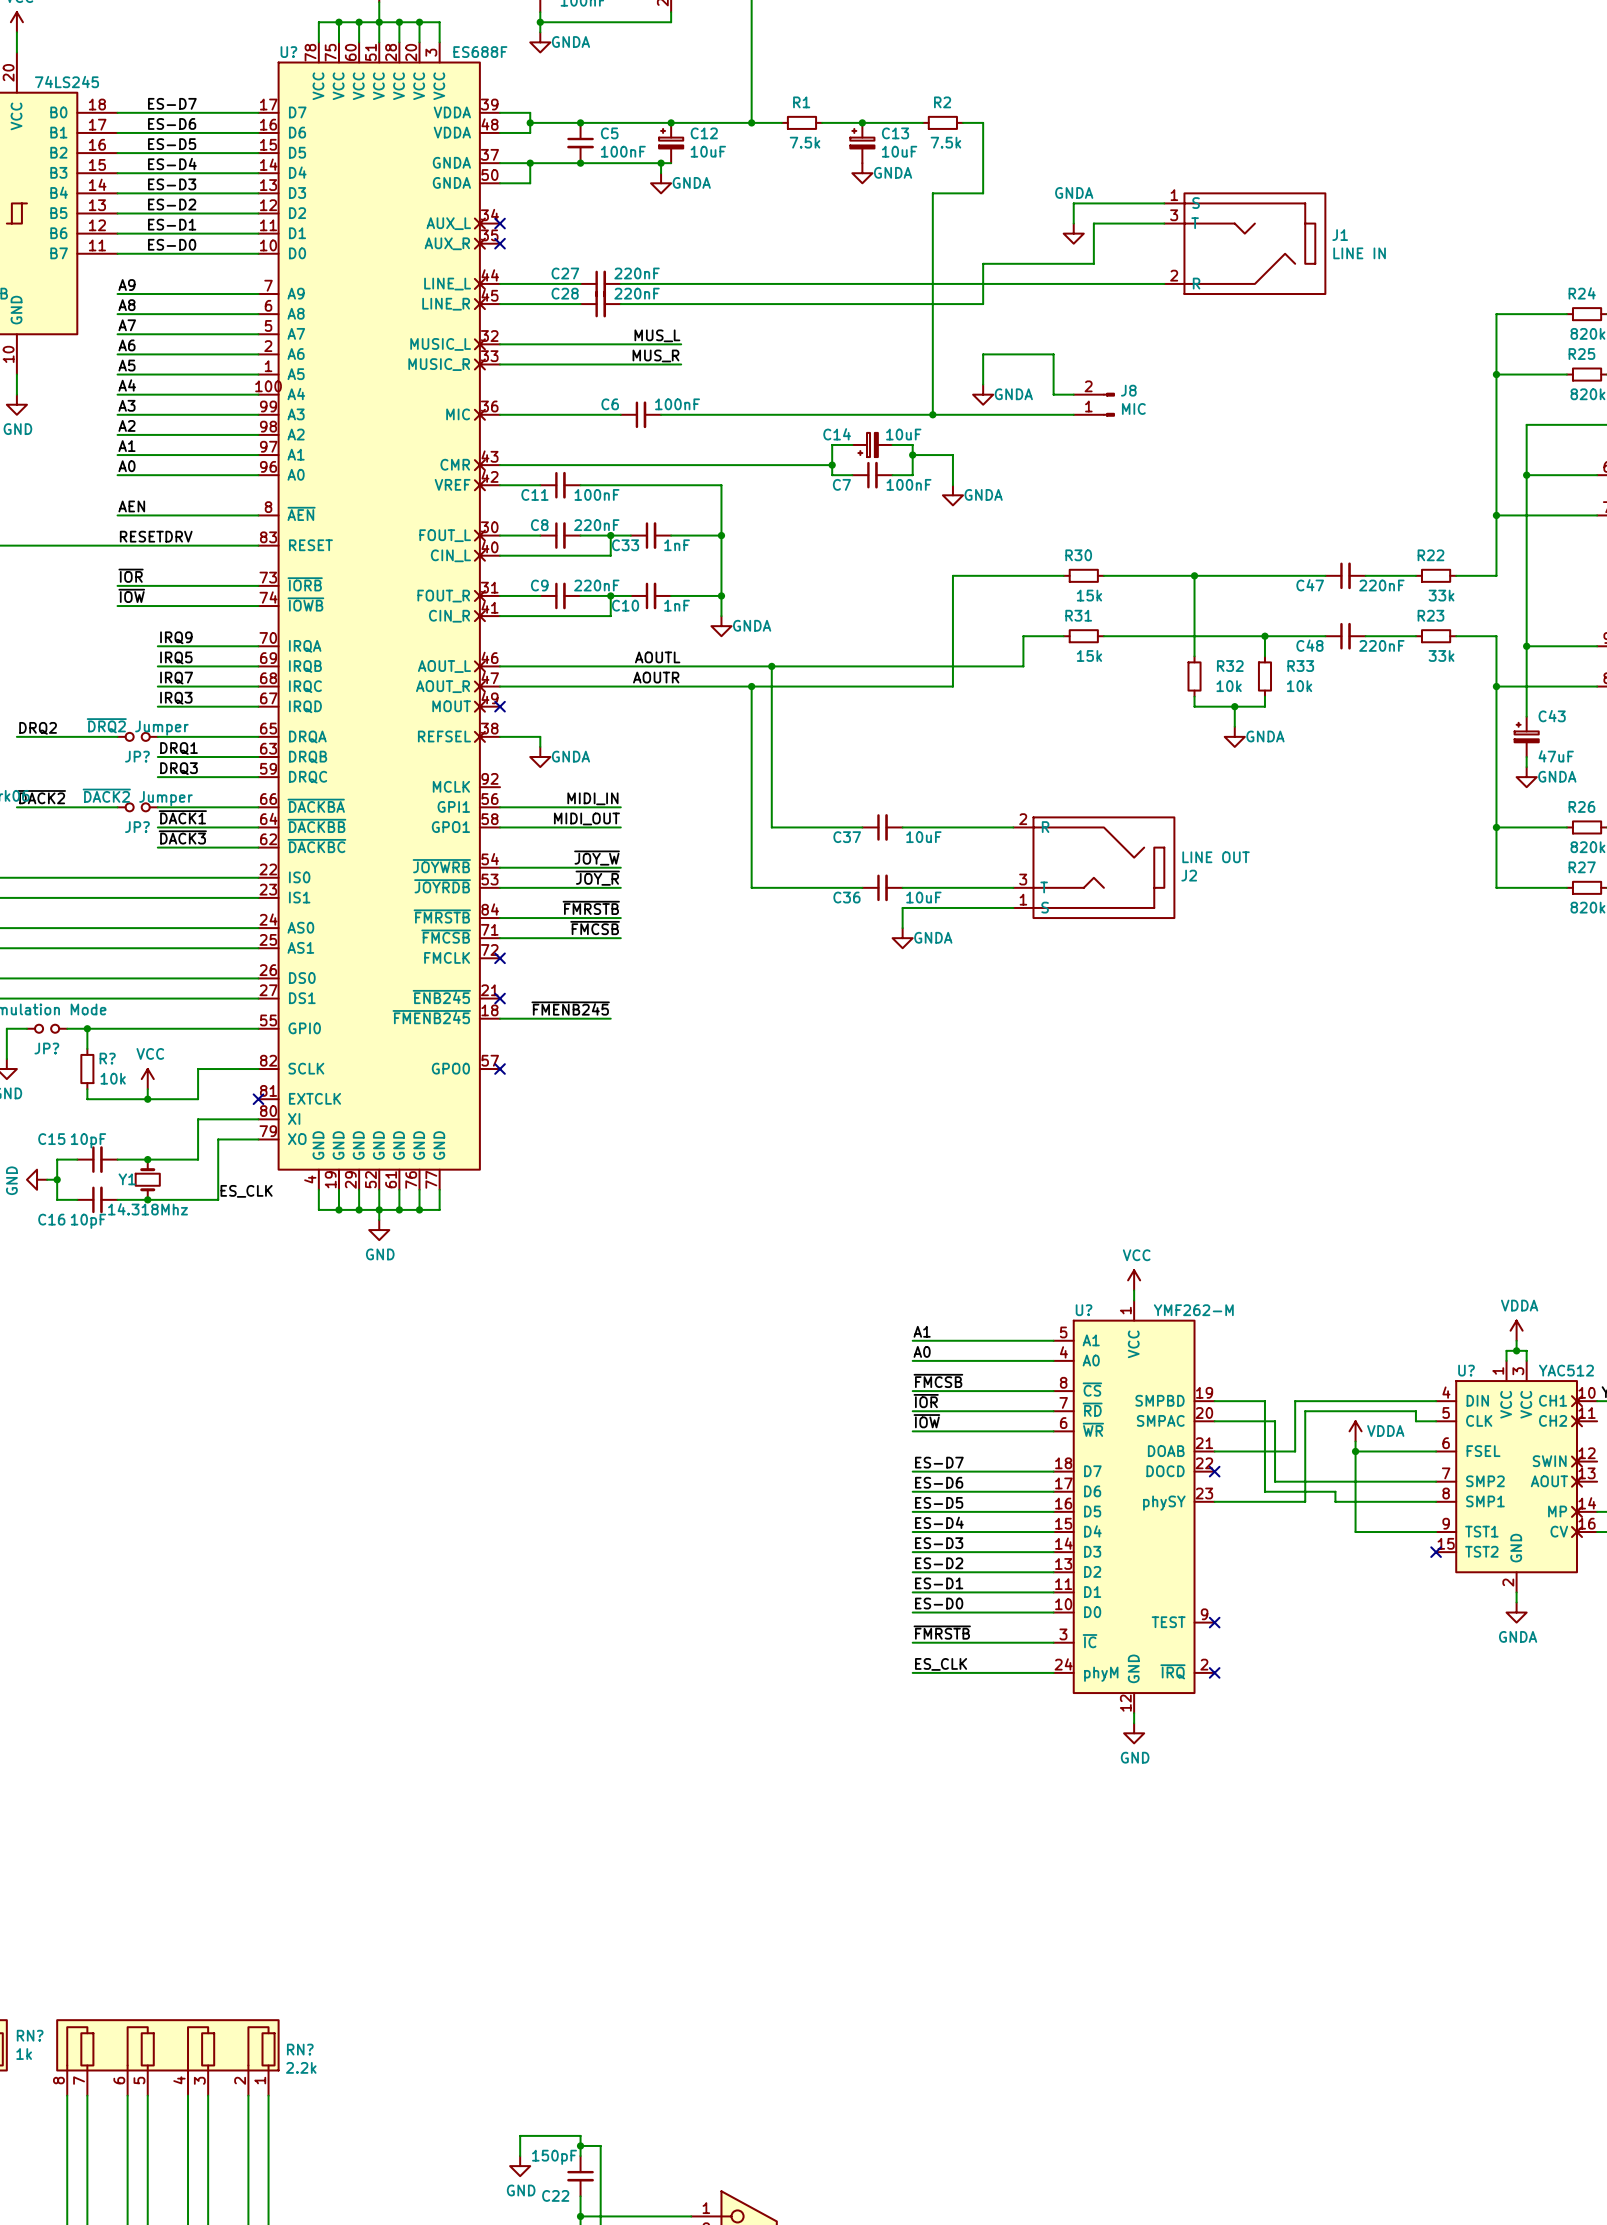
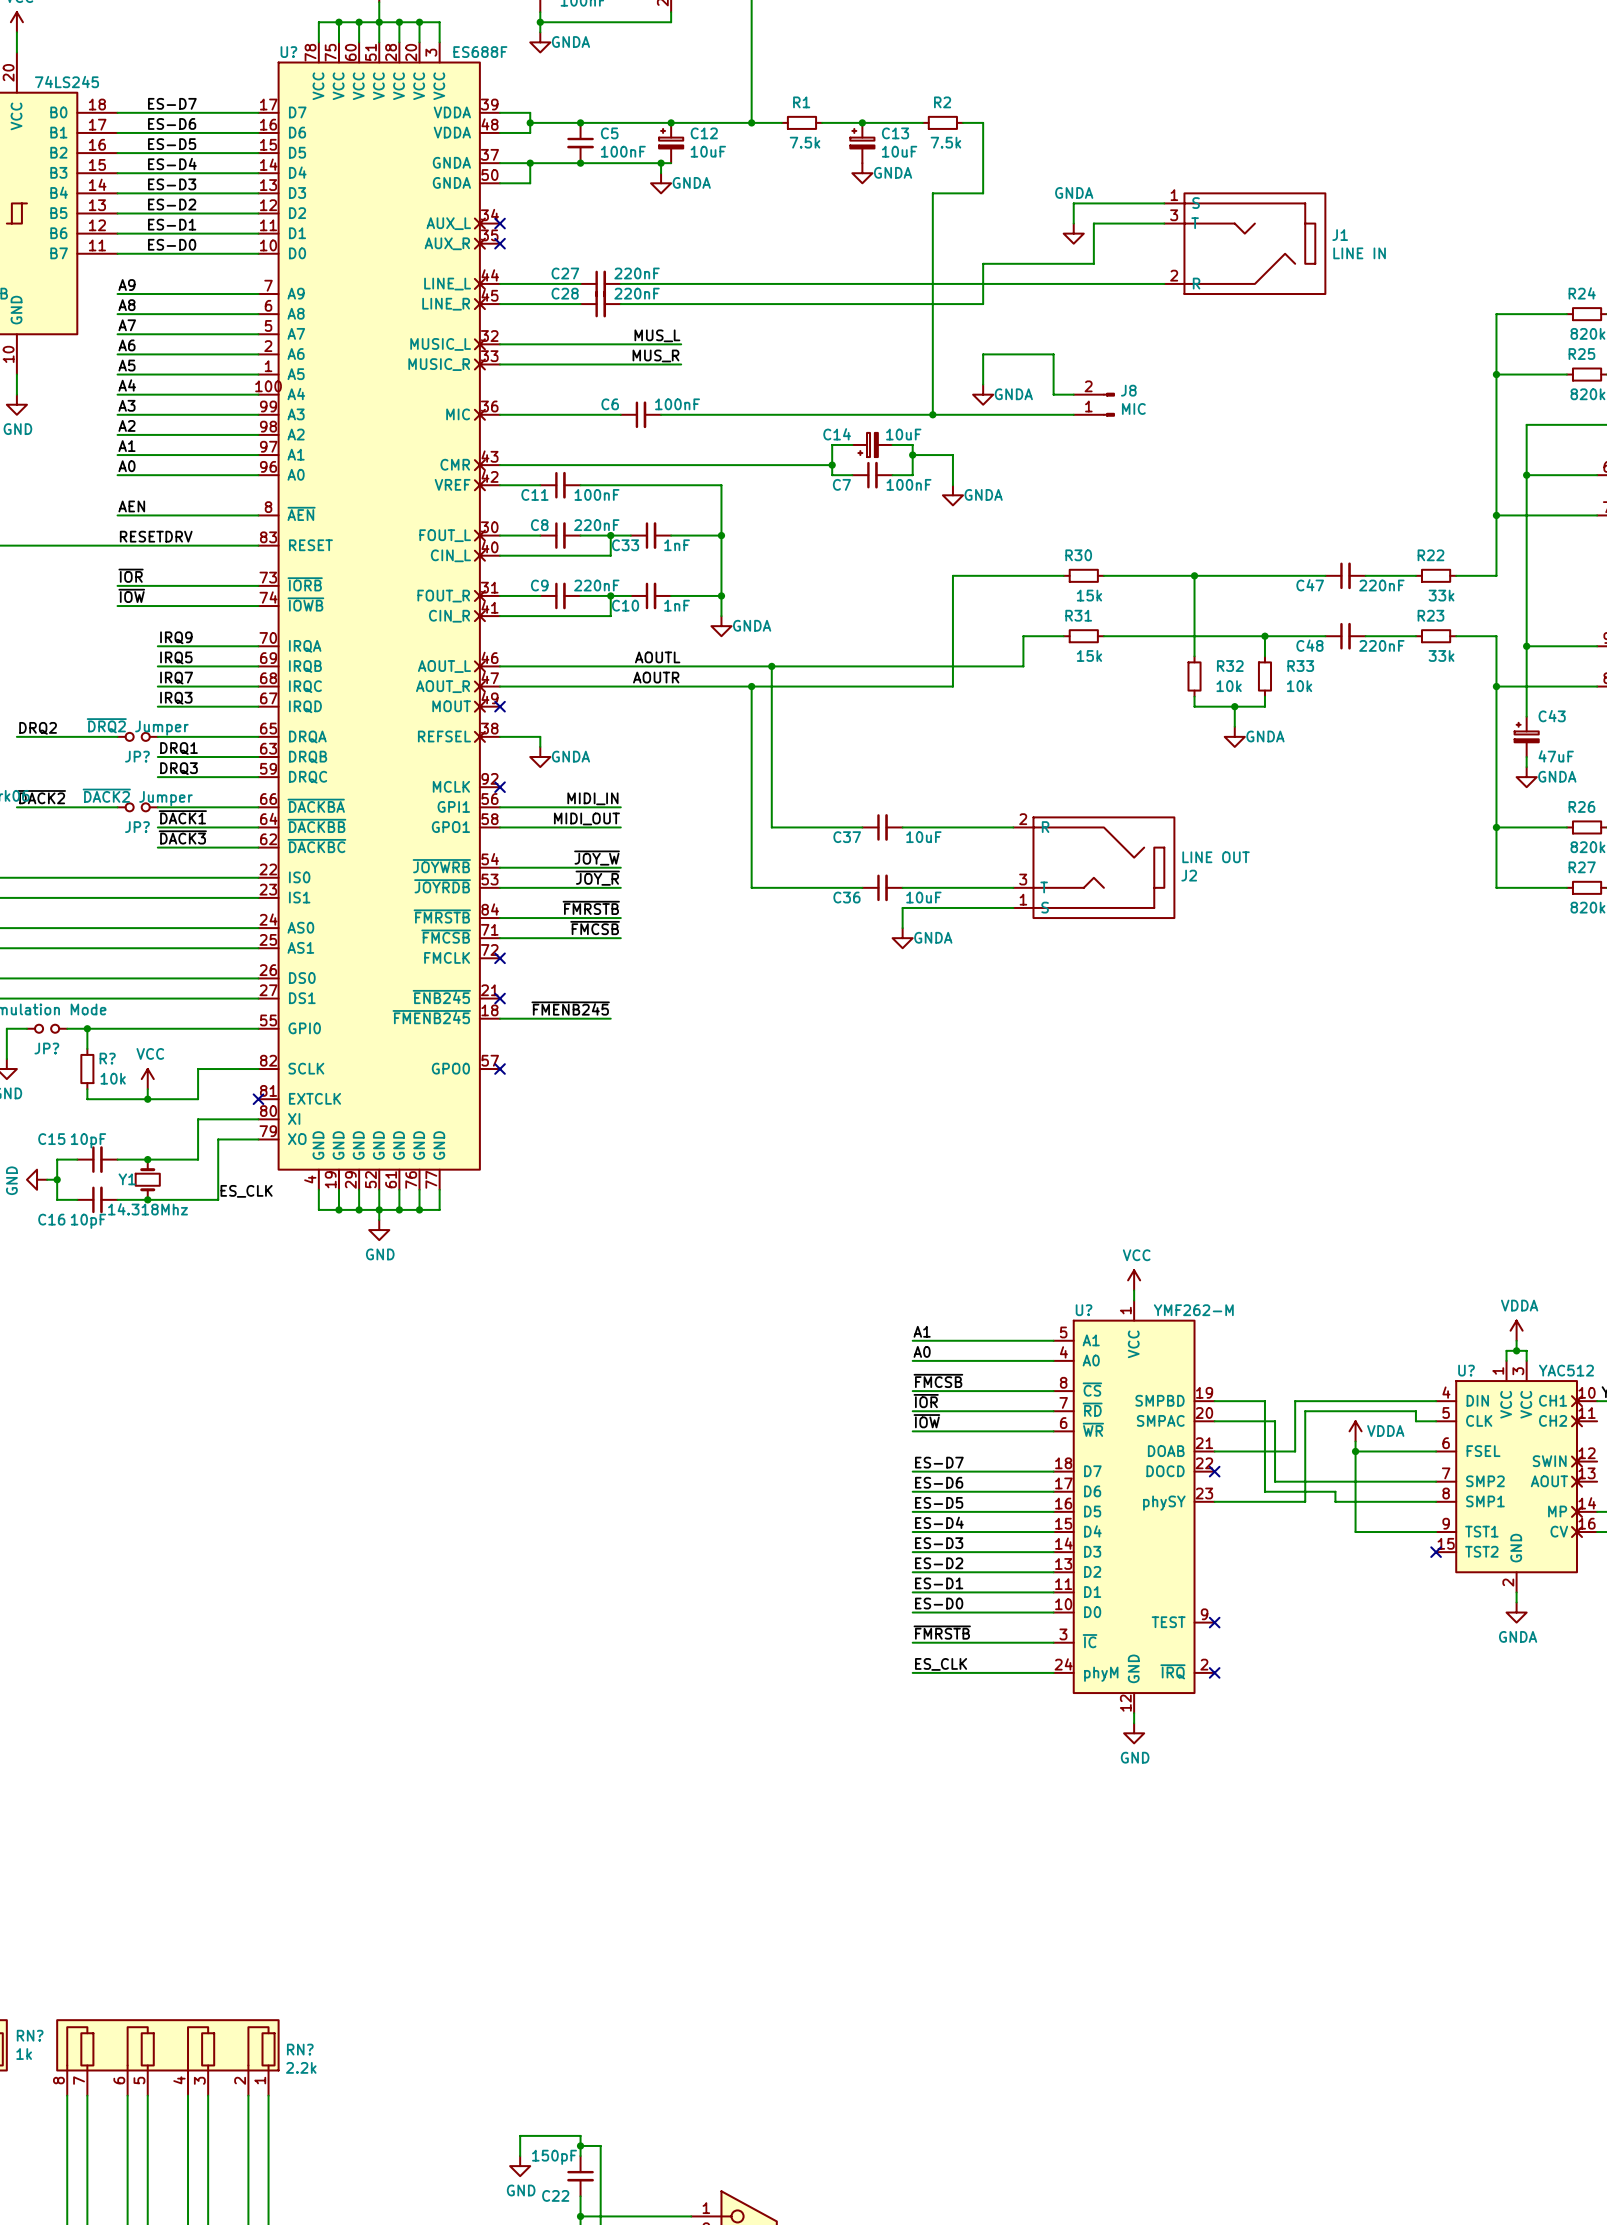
no-connect mark: none -> (500, 787)

